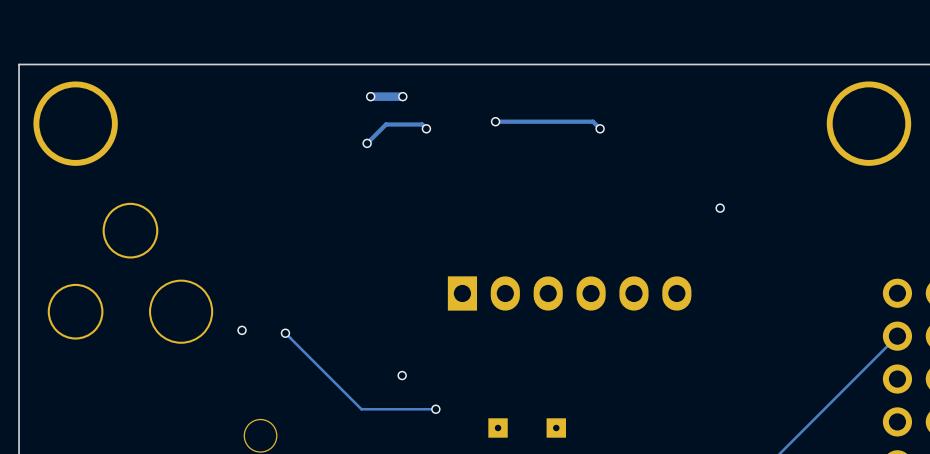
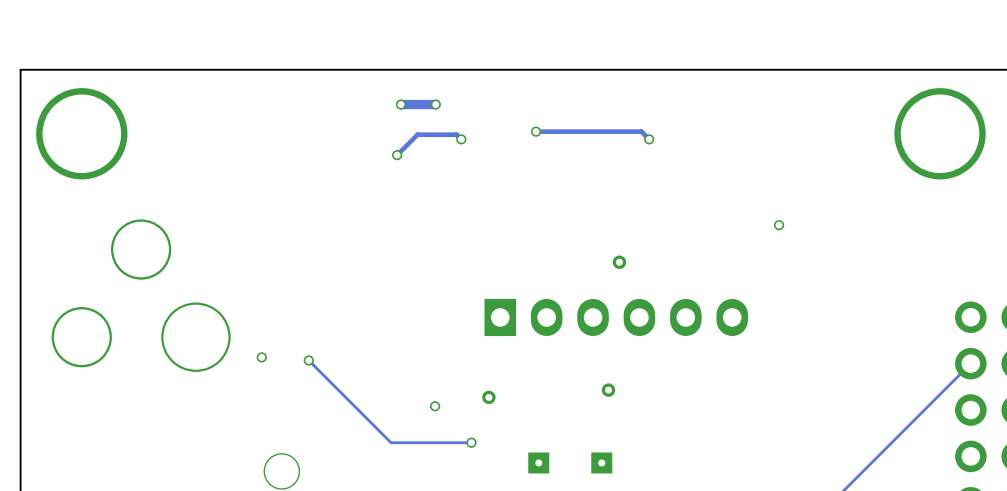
via: none -> (619, 262)
via: none -> (608, 390)
via: none -> (488, 397)

